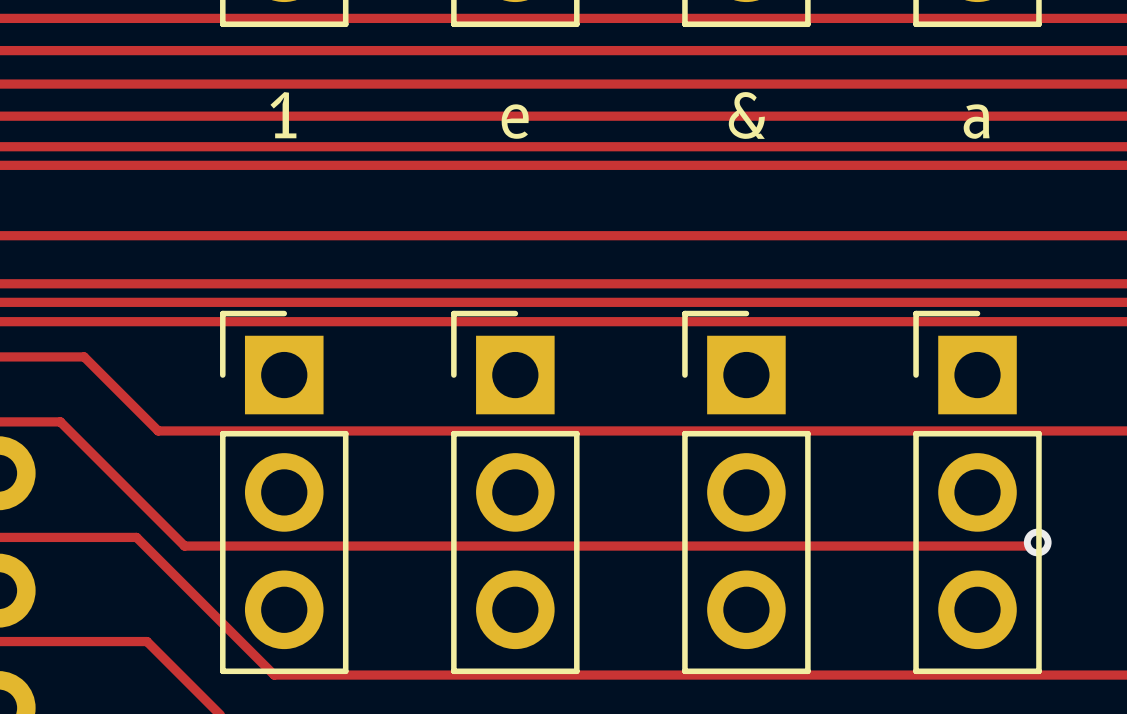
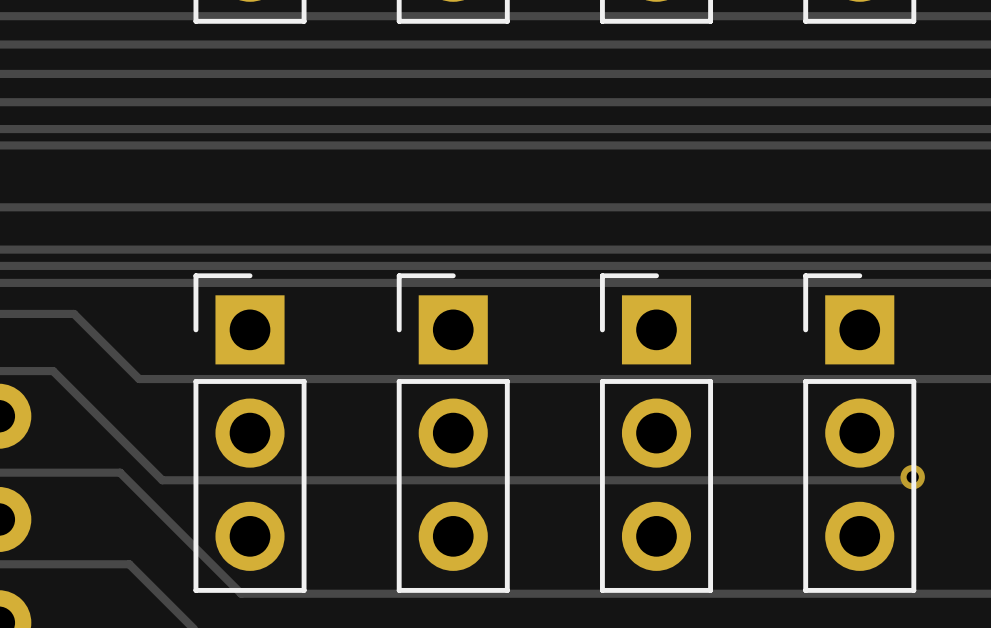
text: 1 (283, 115) -> none
text: & (746, 115) -> none
text: e (515, 121) -> none
text: a (976, 121) -> none

